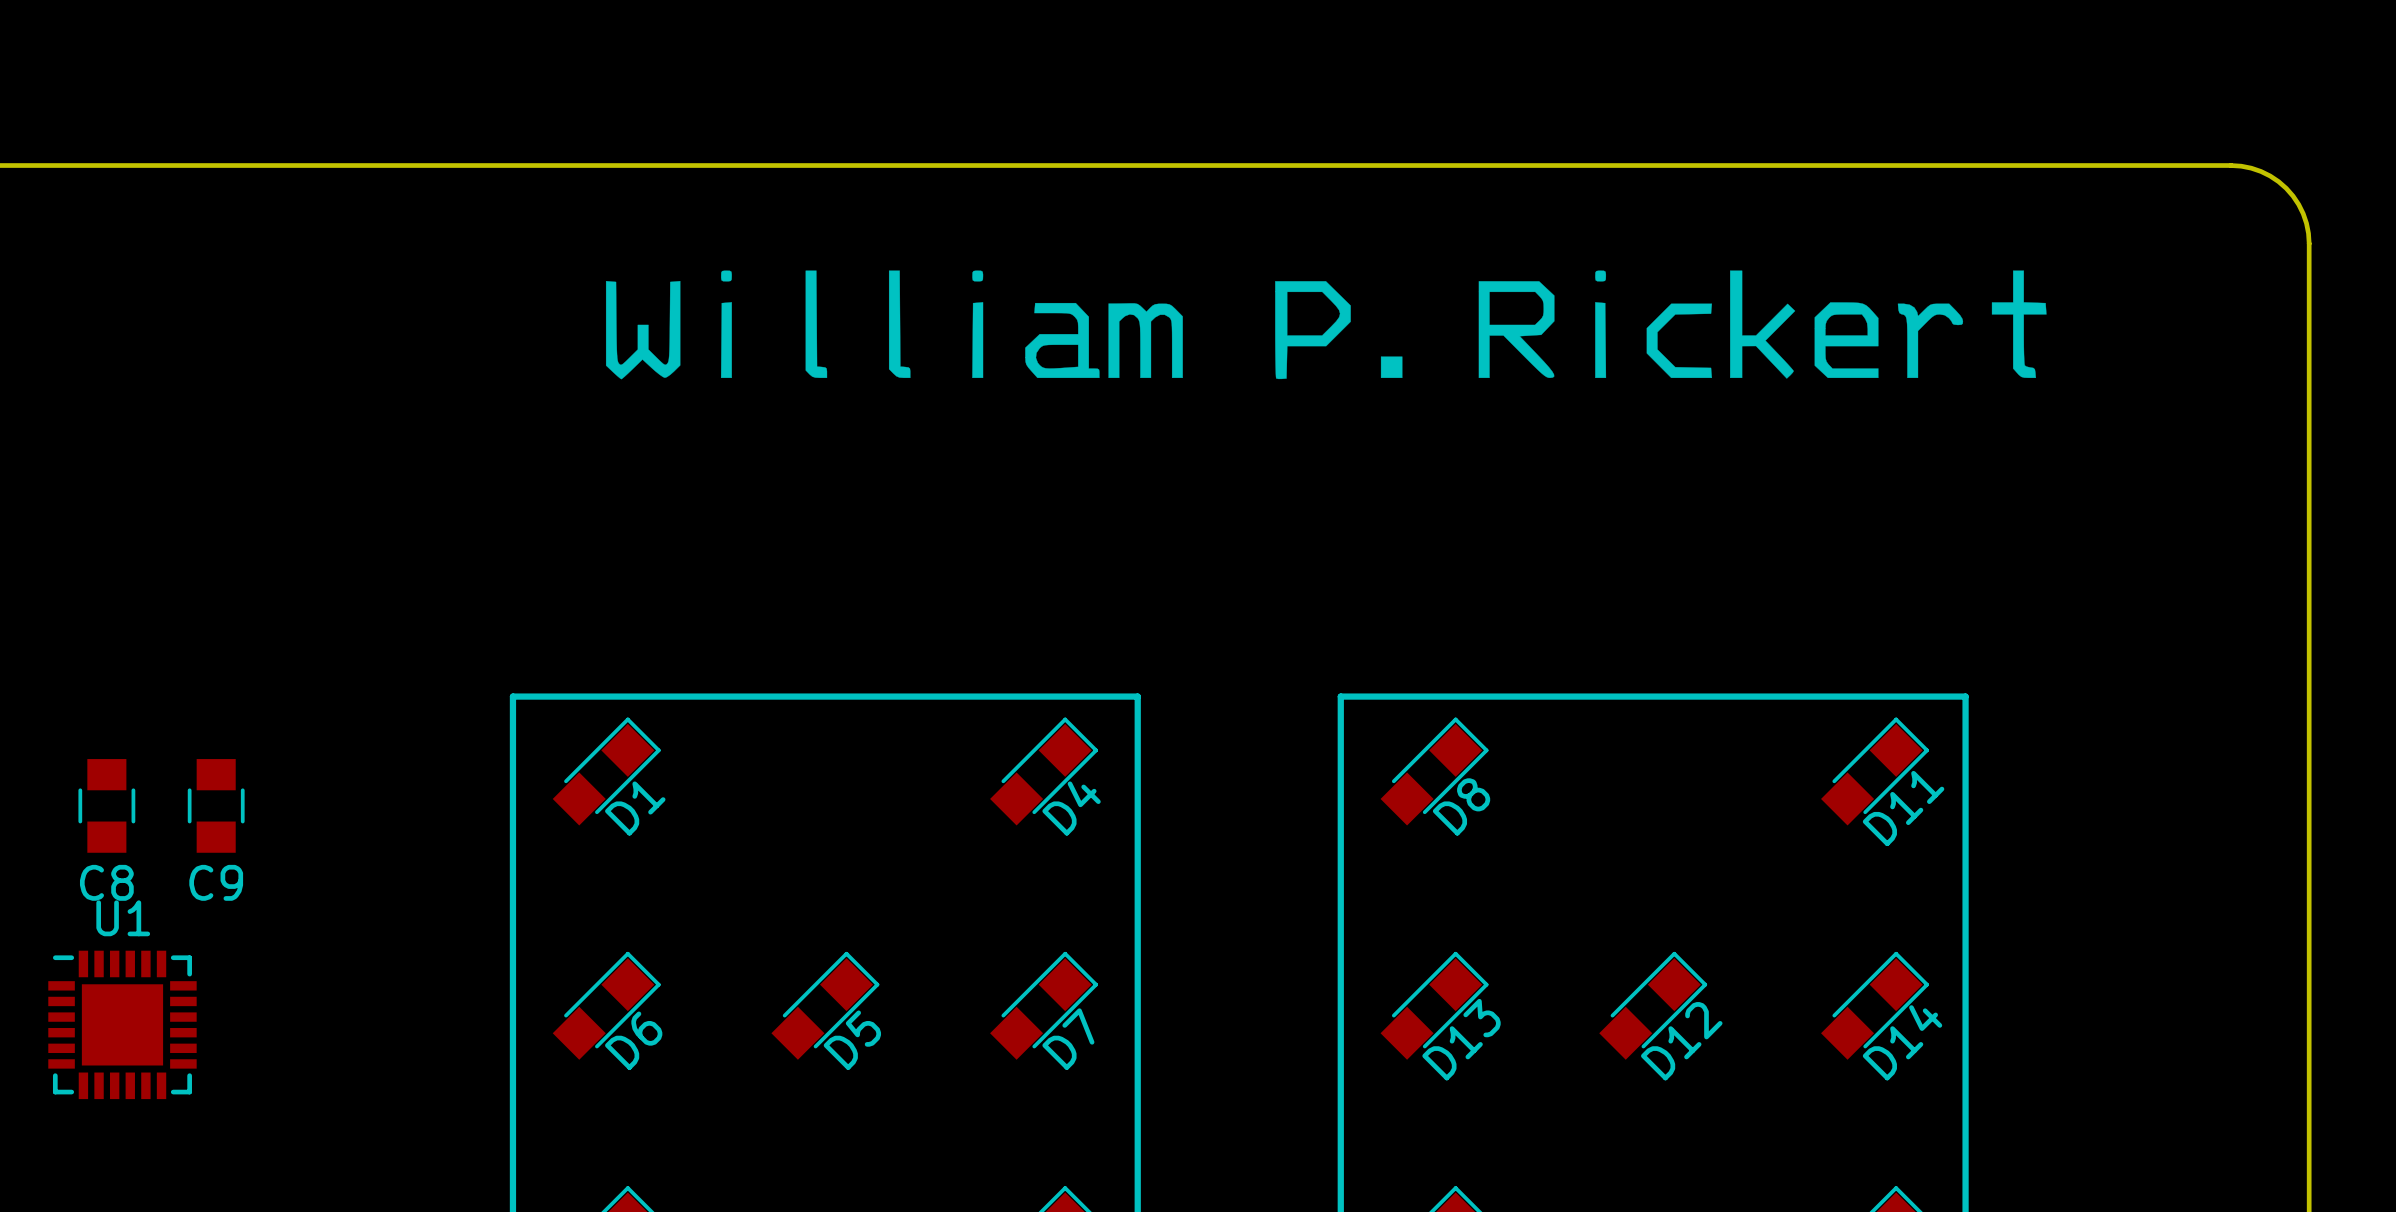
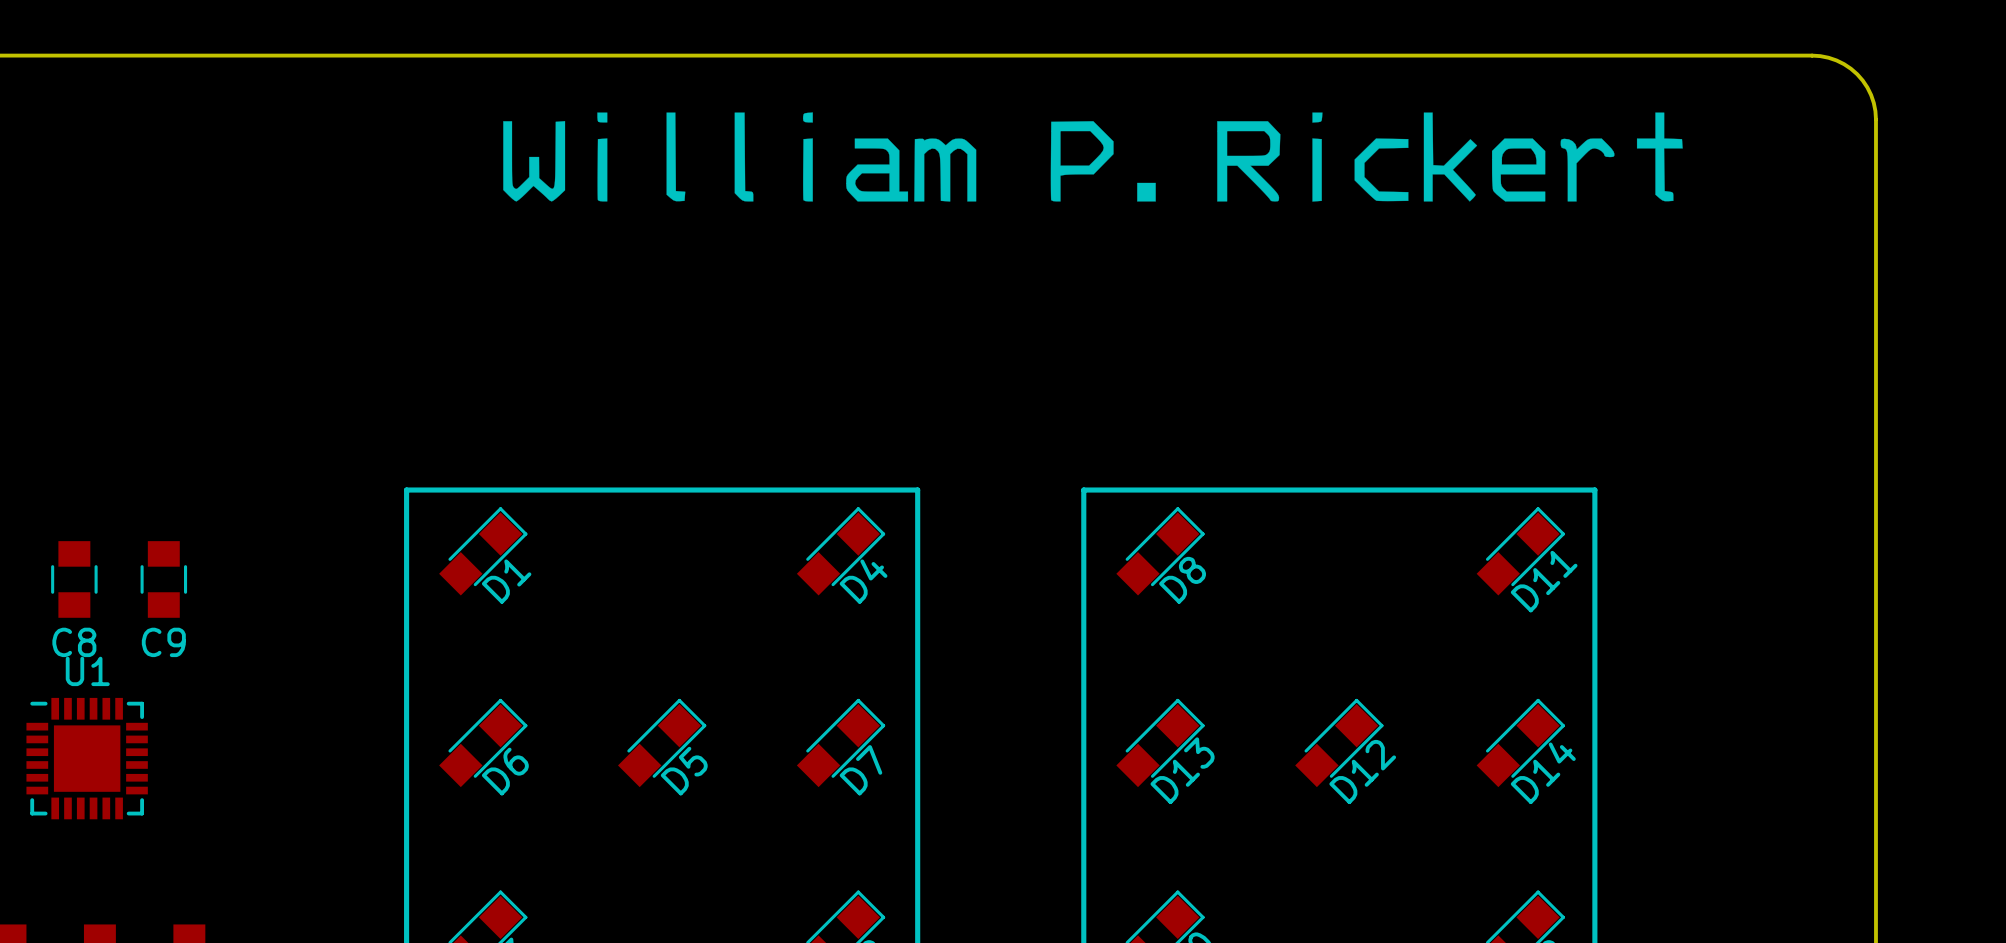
drawing: none -> [503, 112, 1683, 202]
drawing: [605, 270, 2047, 380] -> none

